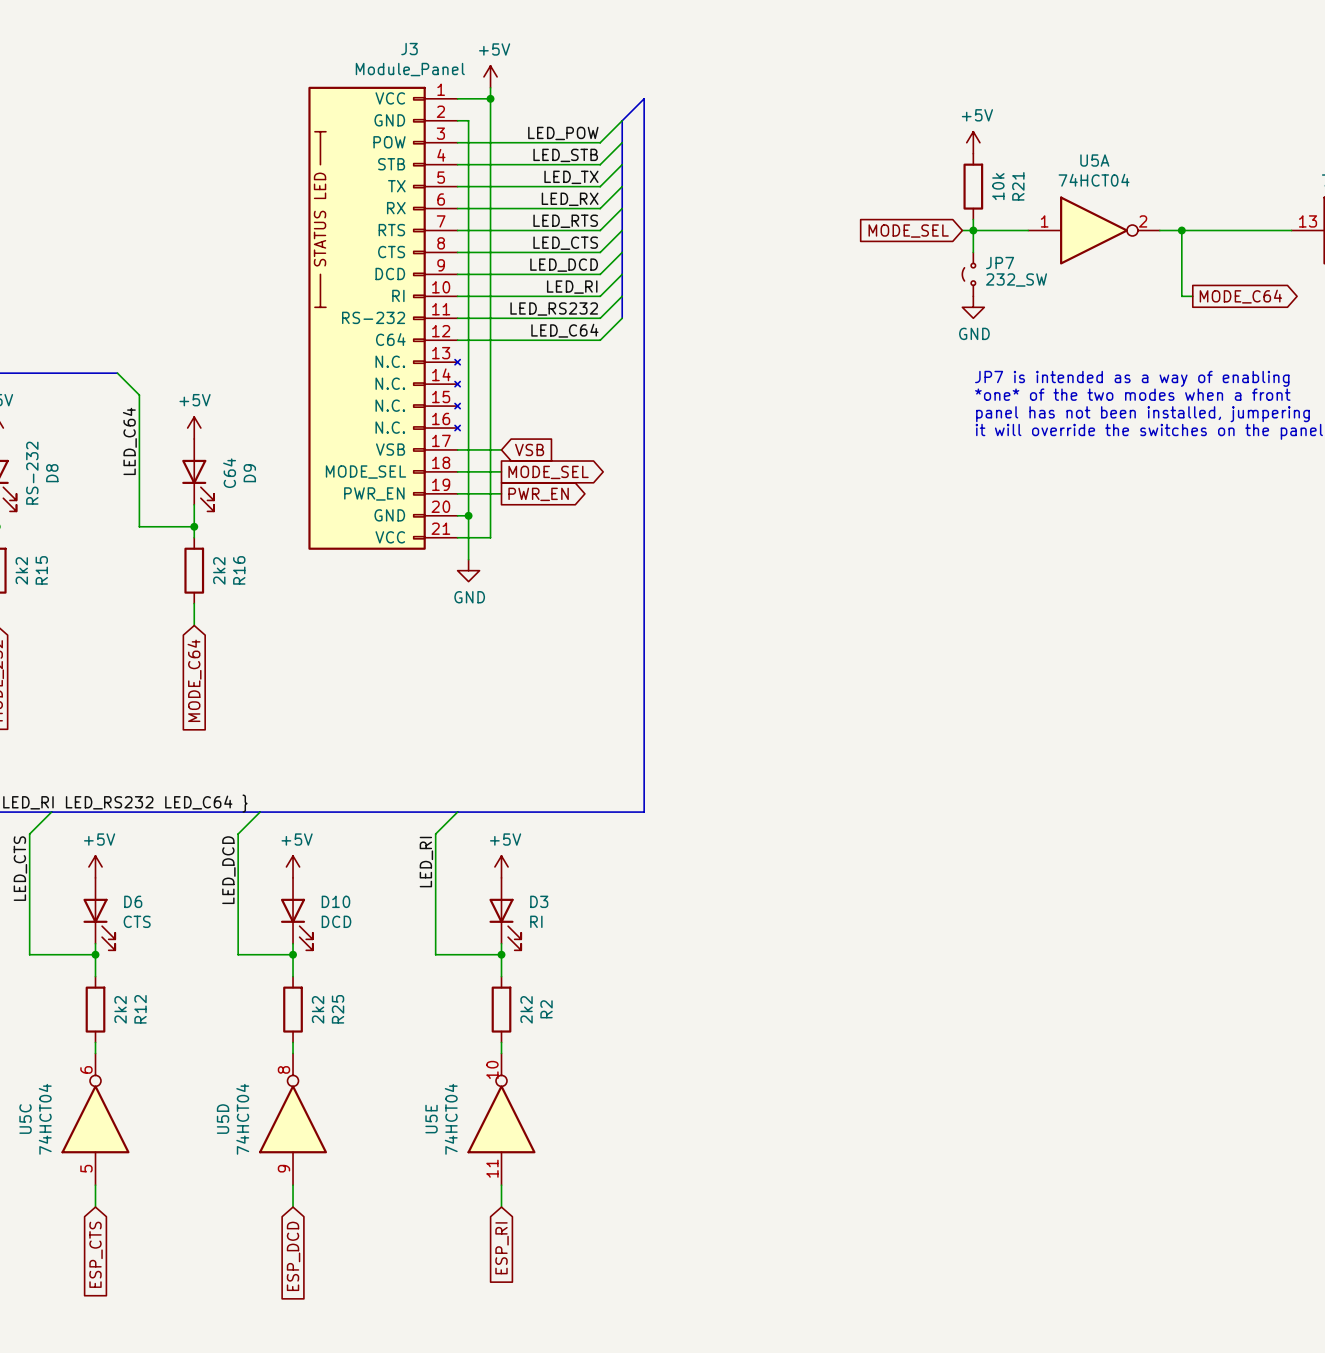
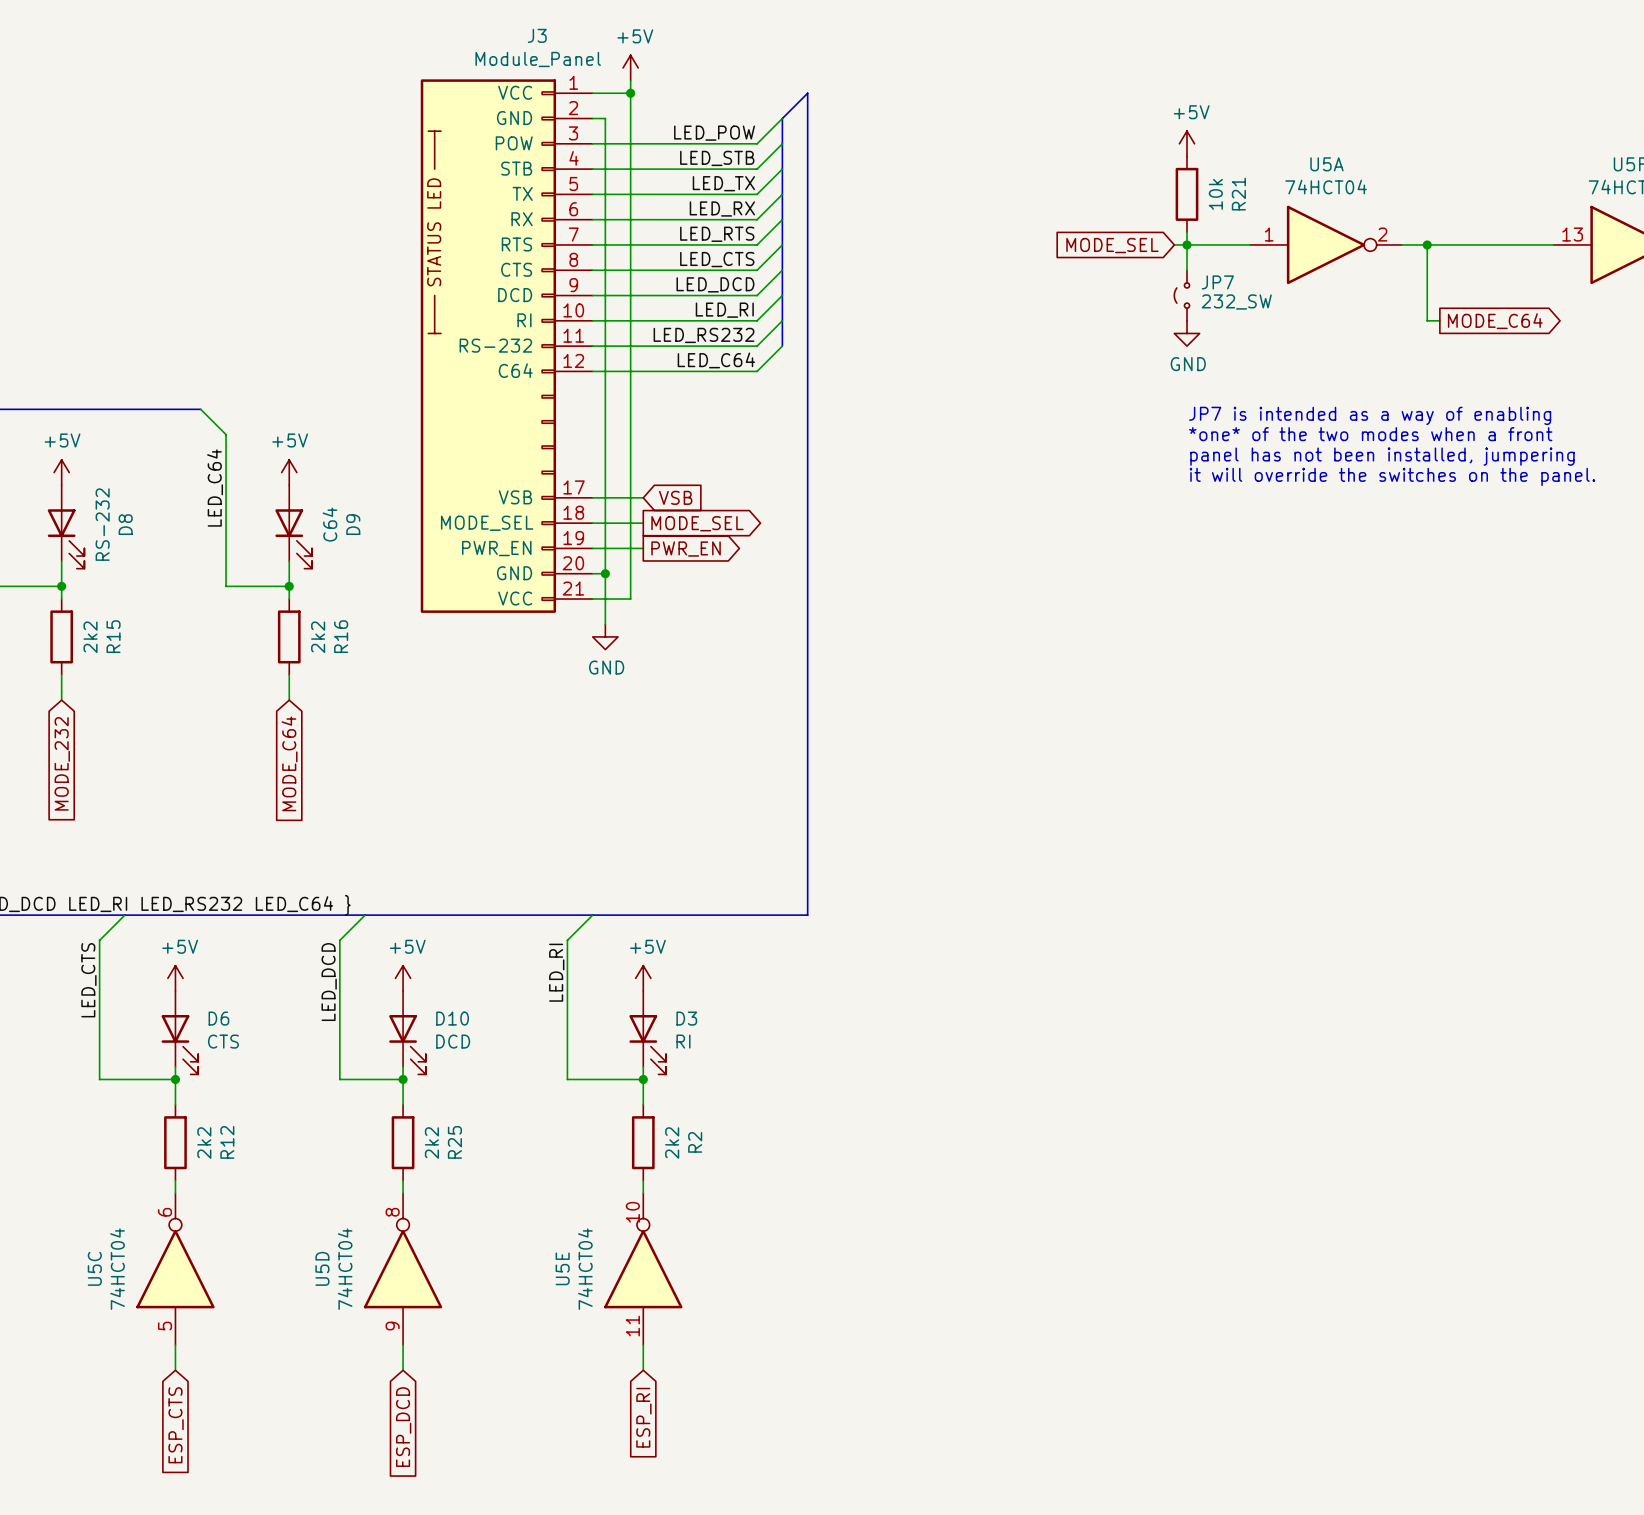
J3 symbol: [308, 86, 461, 550] -> [420, 79, 593, 613]

